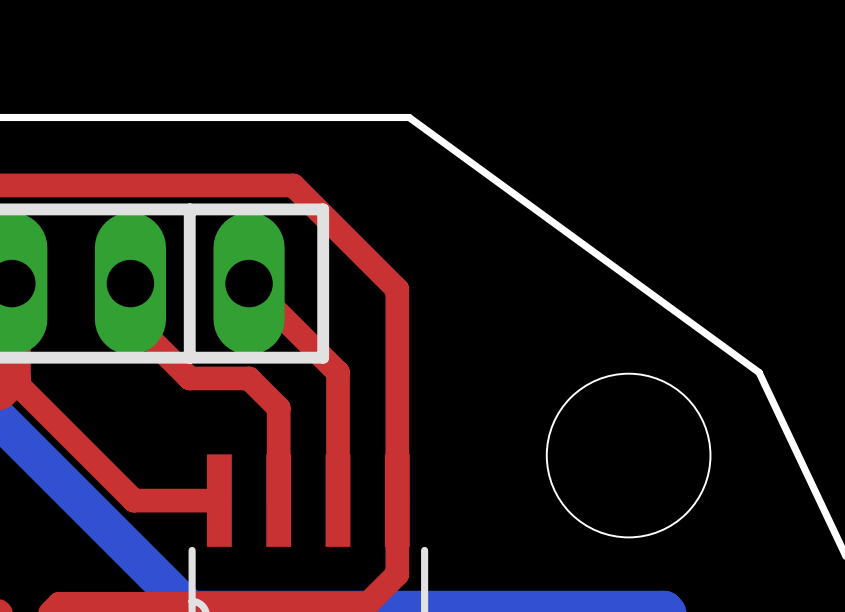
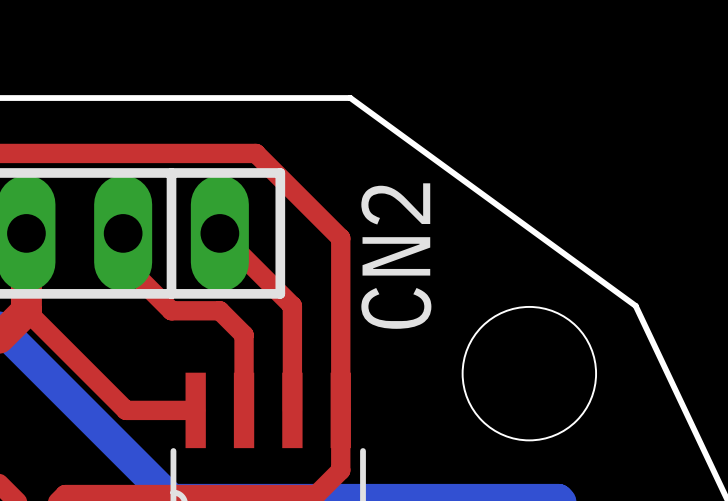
CN2 name: none -> CN2 (396, 256)

